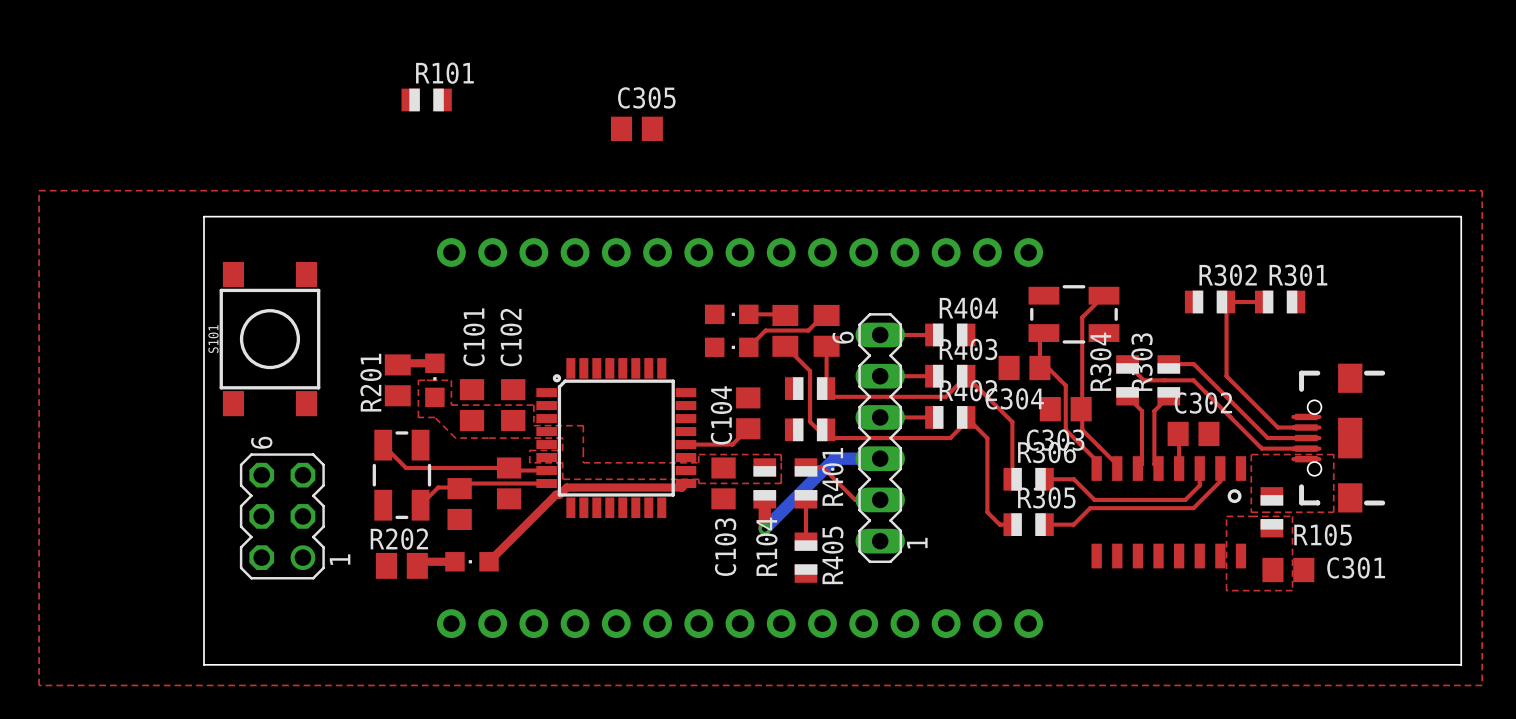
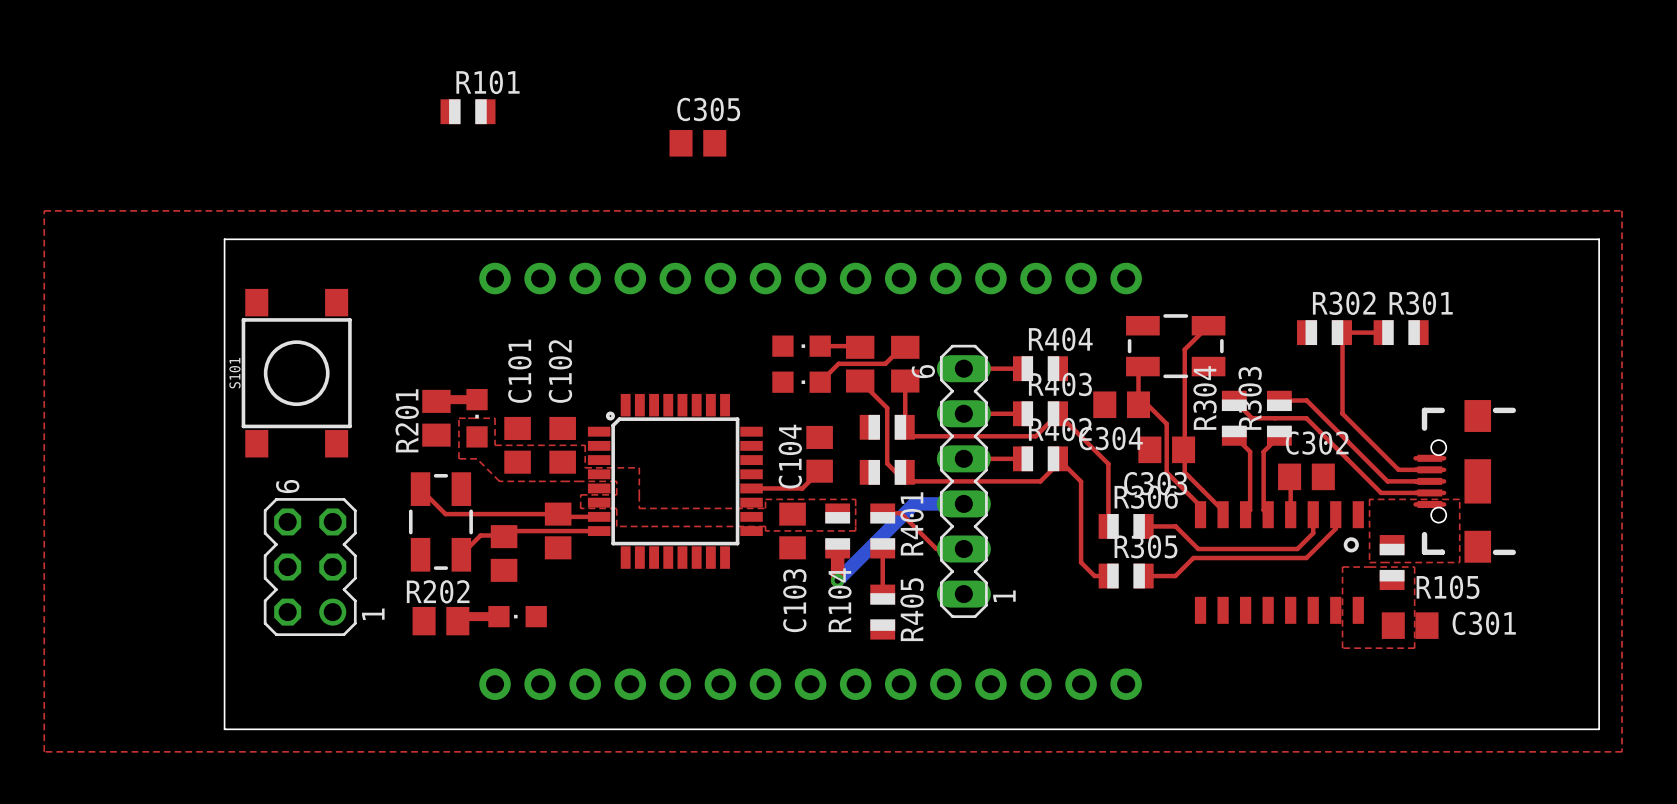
top track: (686, 483) (681, 487) (566, 487) (559, 494) (556, 494) (489, 561) -> none

